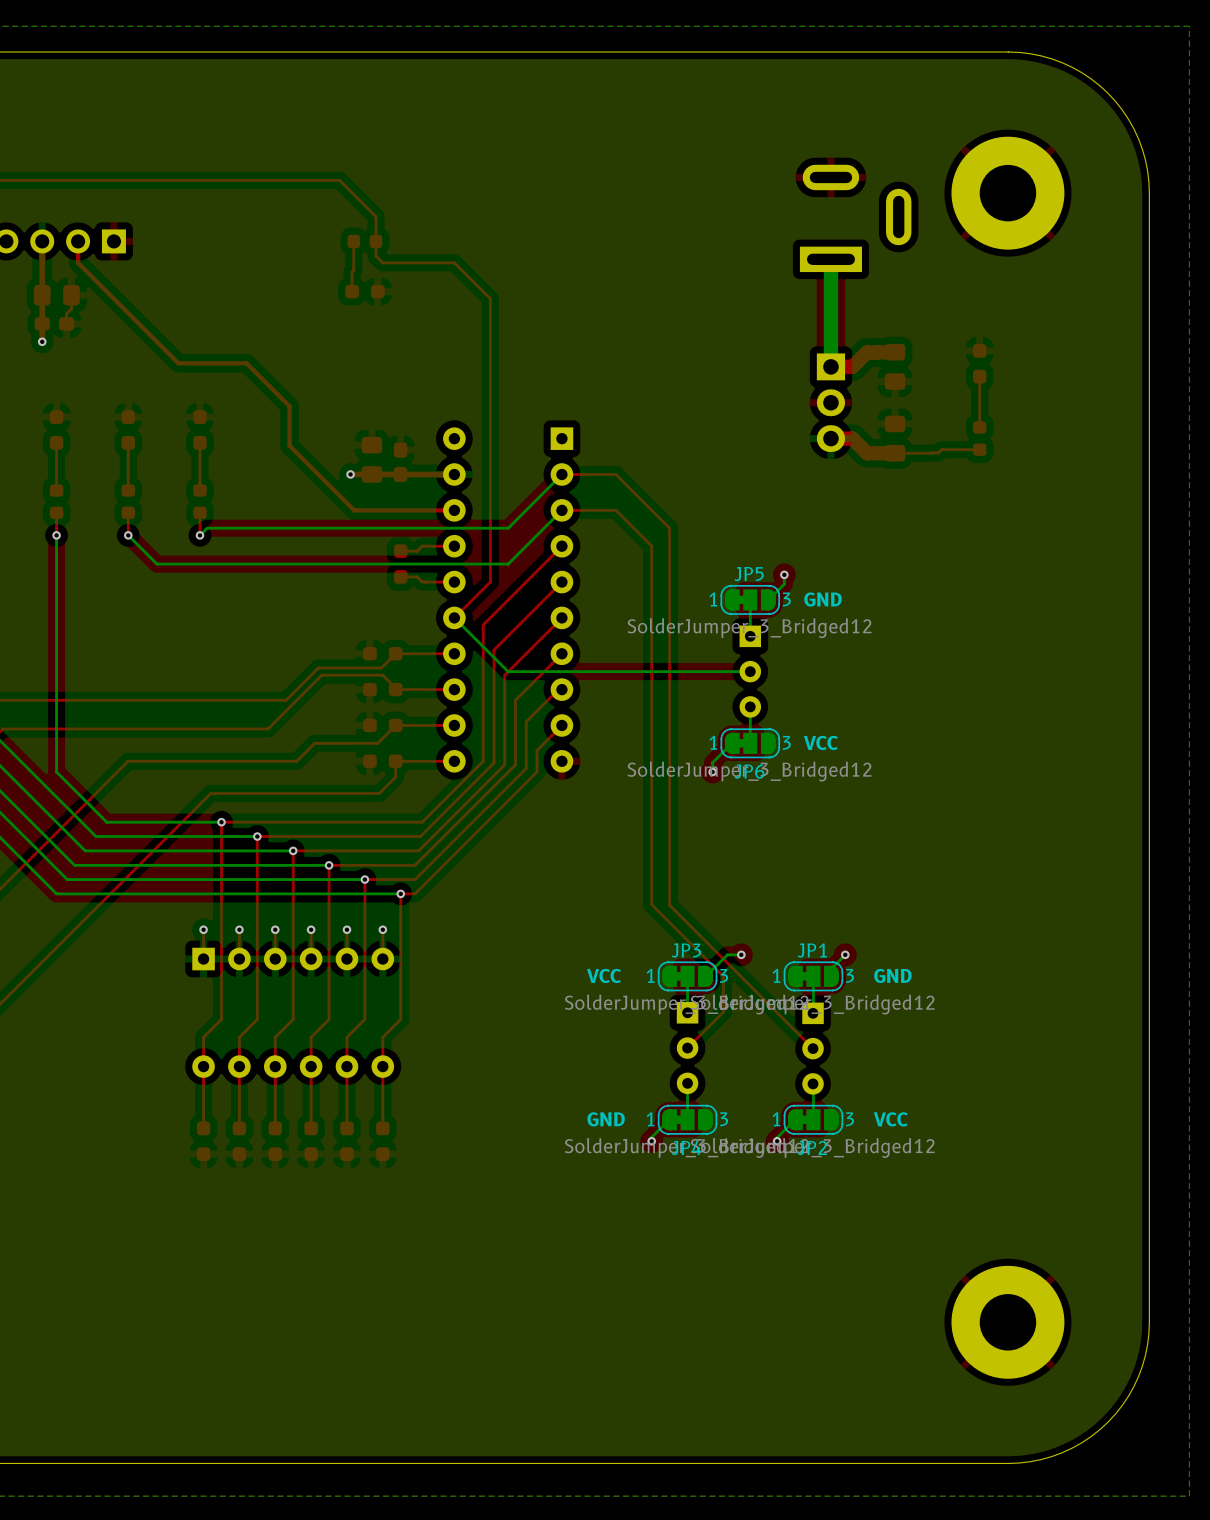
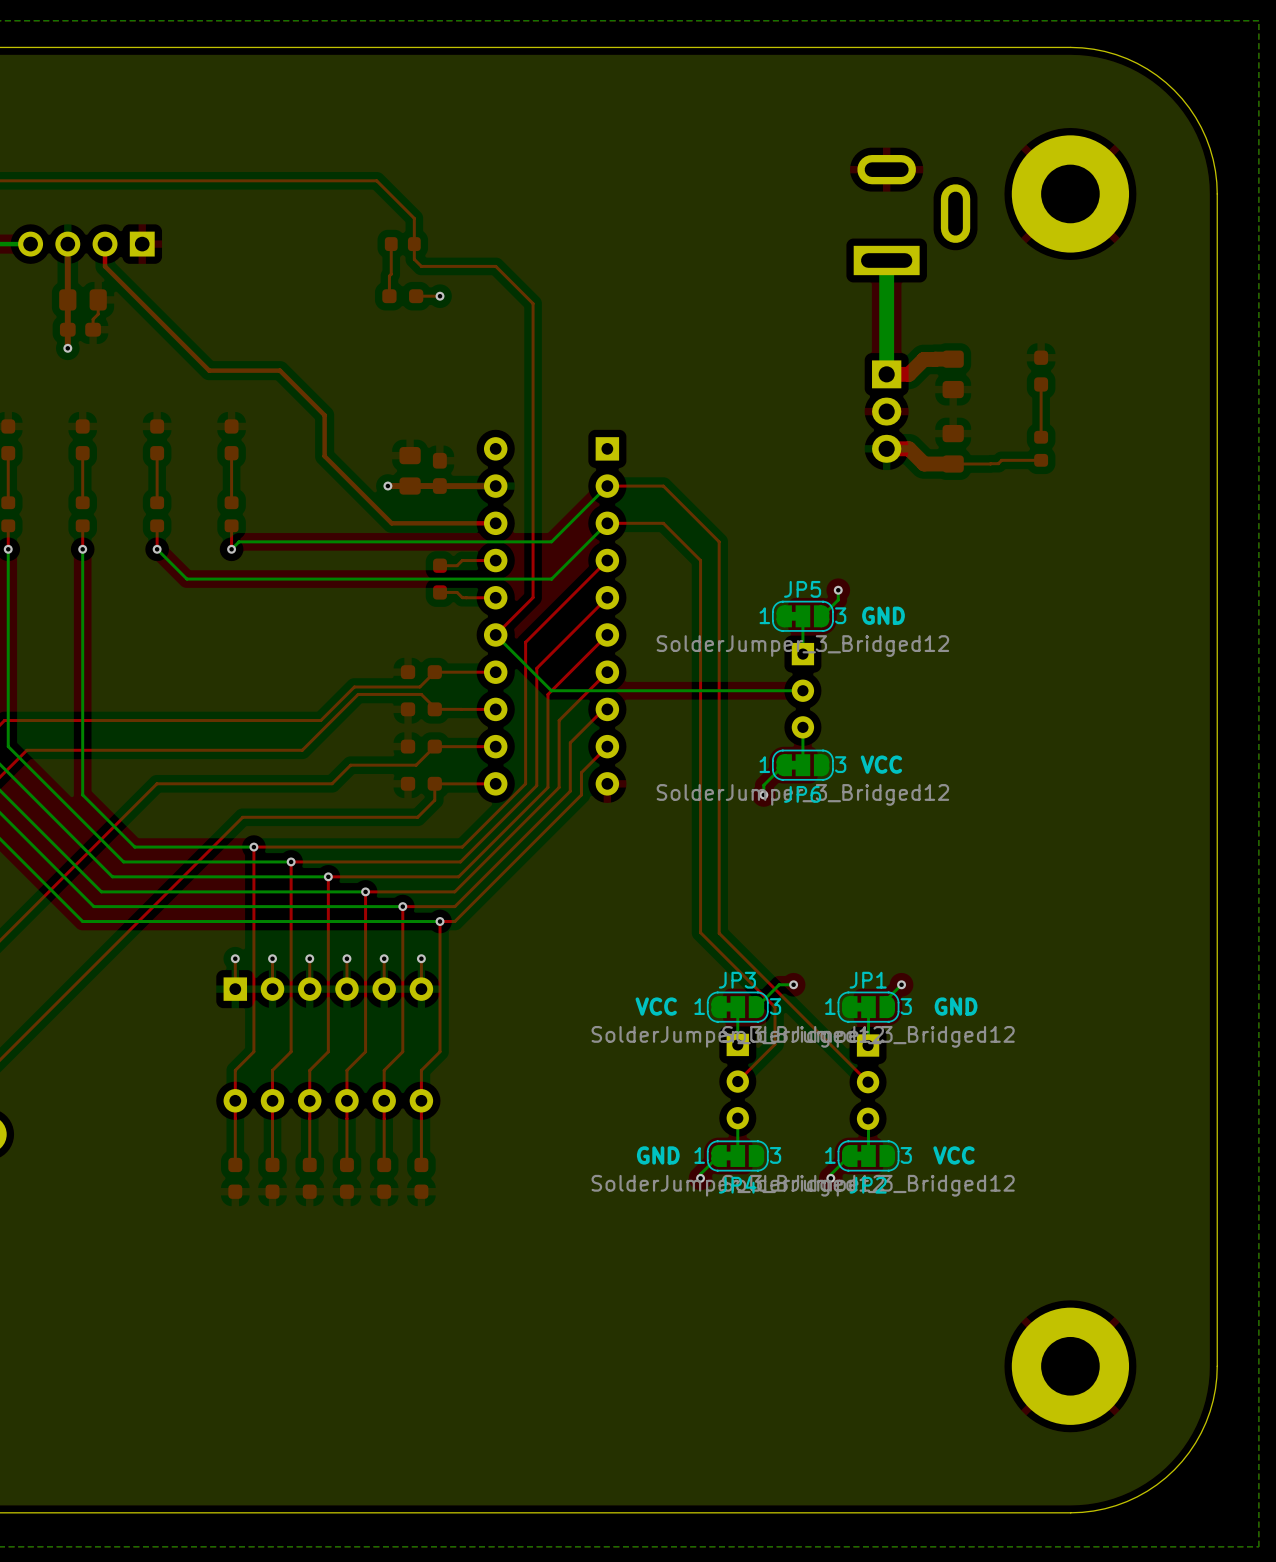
part footprint: [799, 164, 912, 273] -> [853, 154, 971, 276]
top track: none -> (440, 296) (416, 296)
via: none -> (440, 296)

